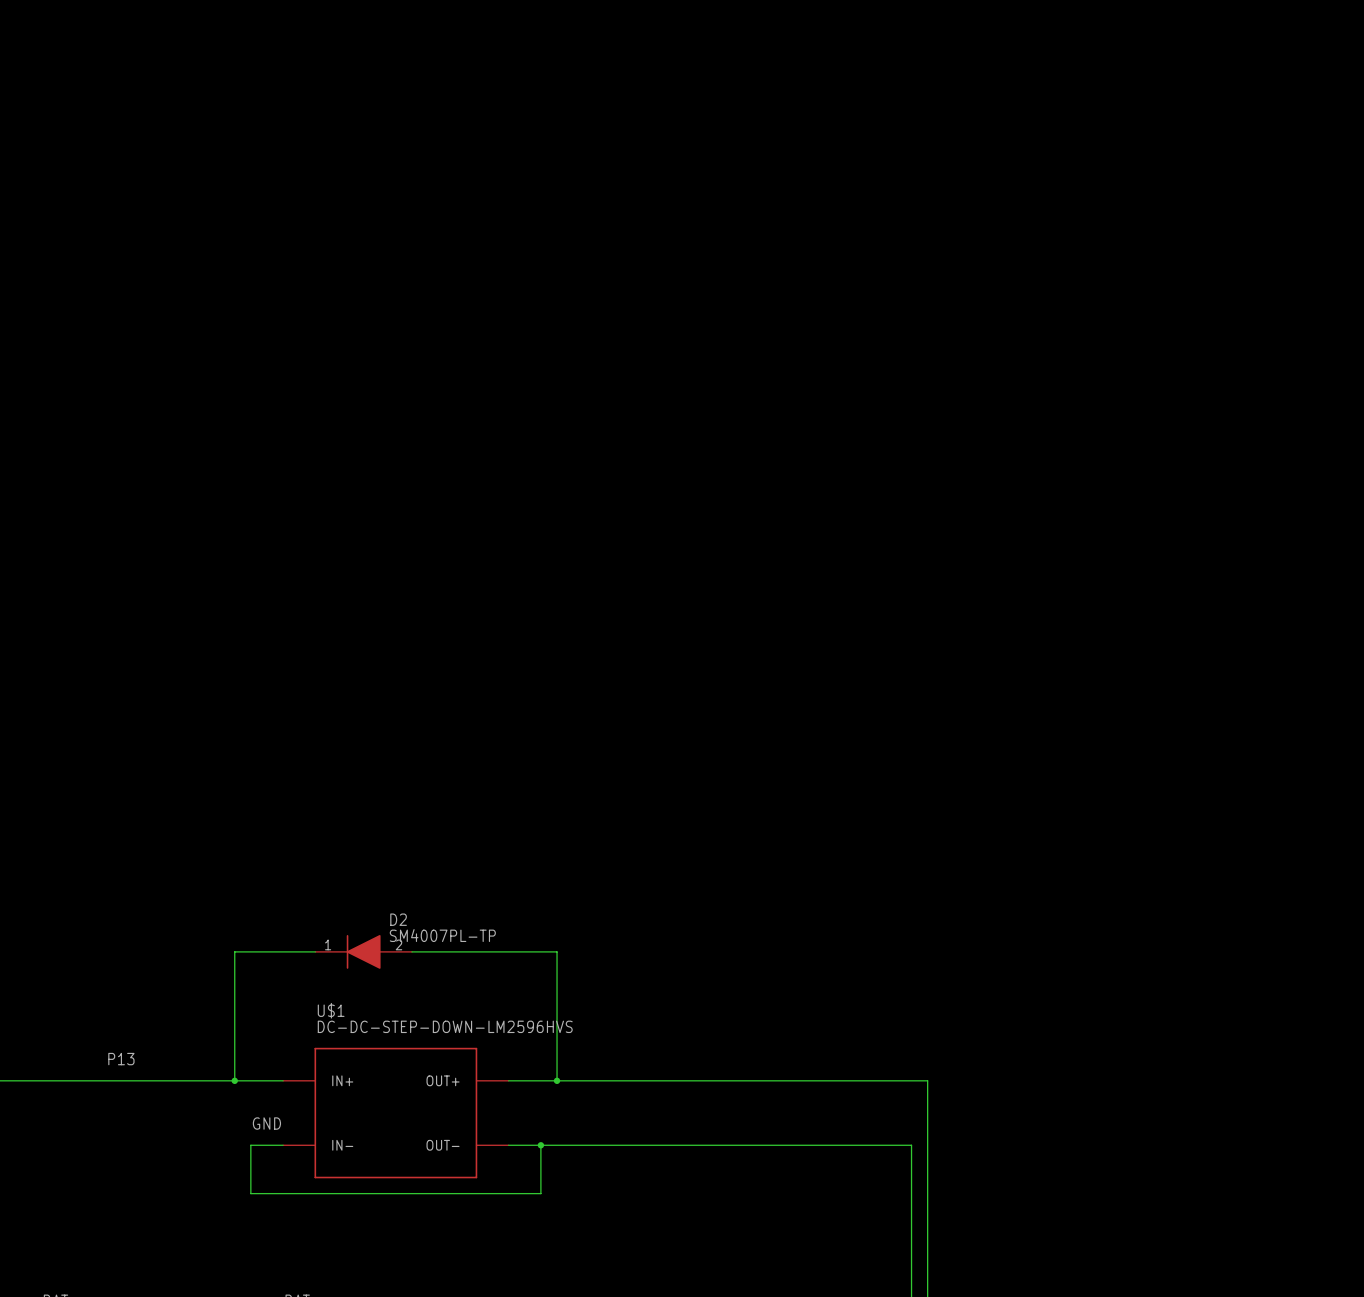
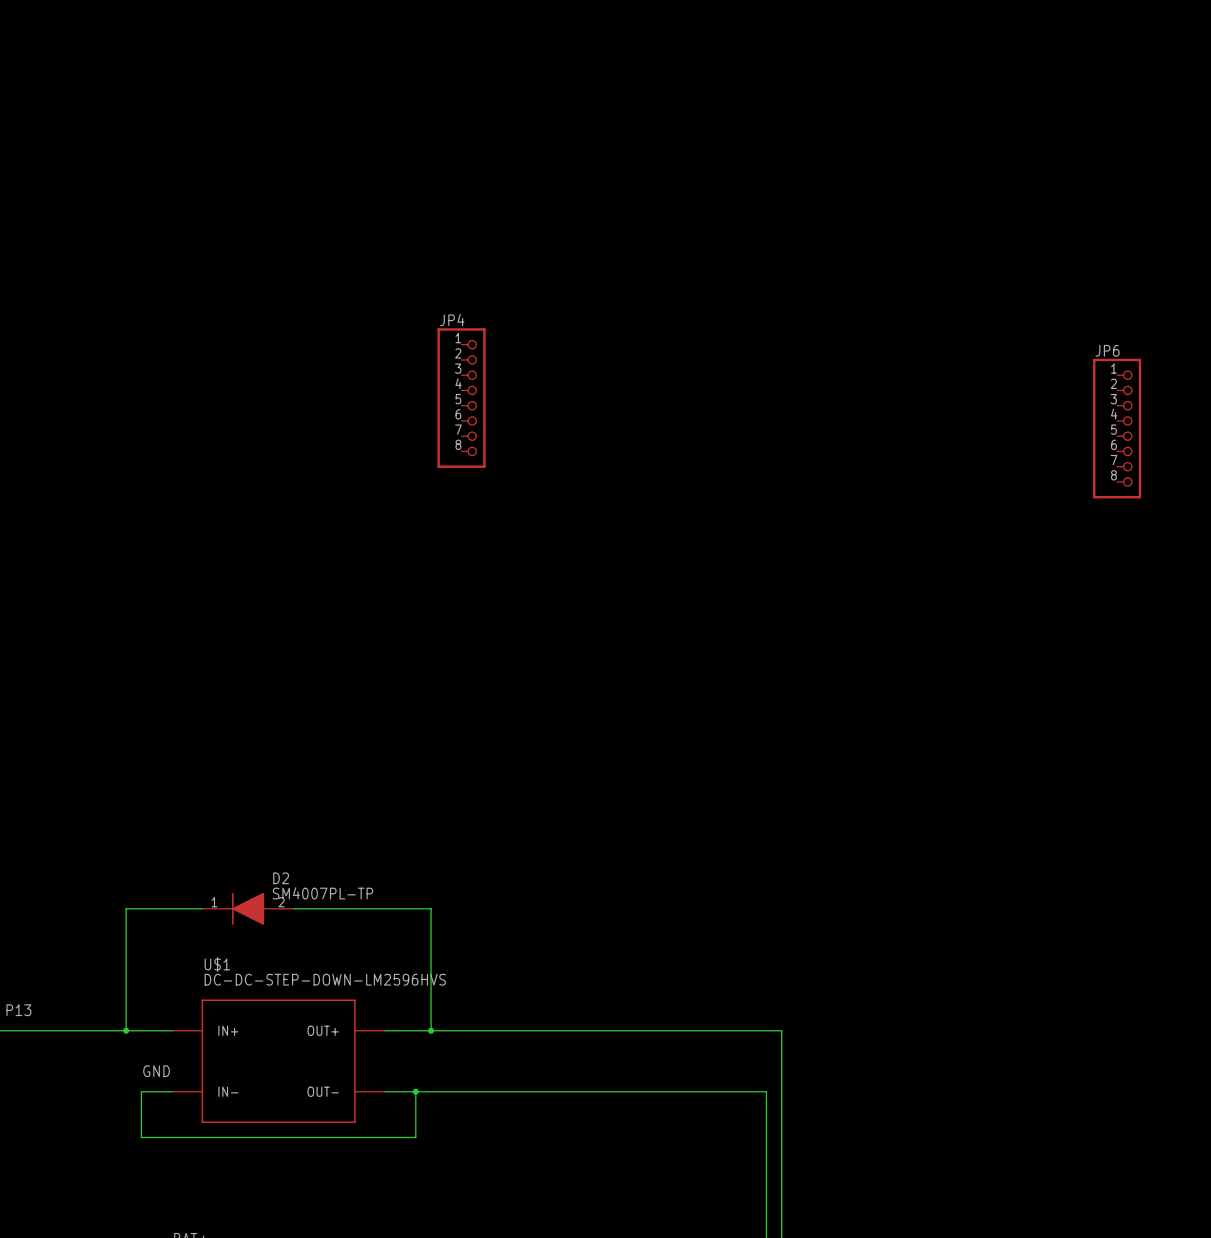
JP4: none -> (461, 398)
JP6: none -> (1117, 428)

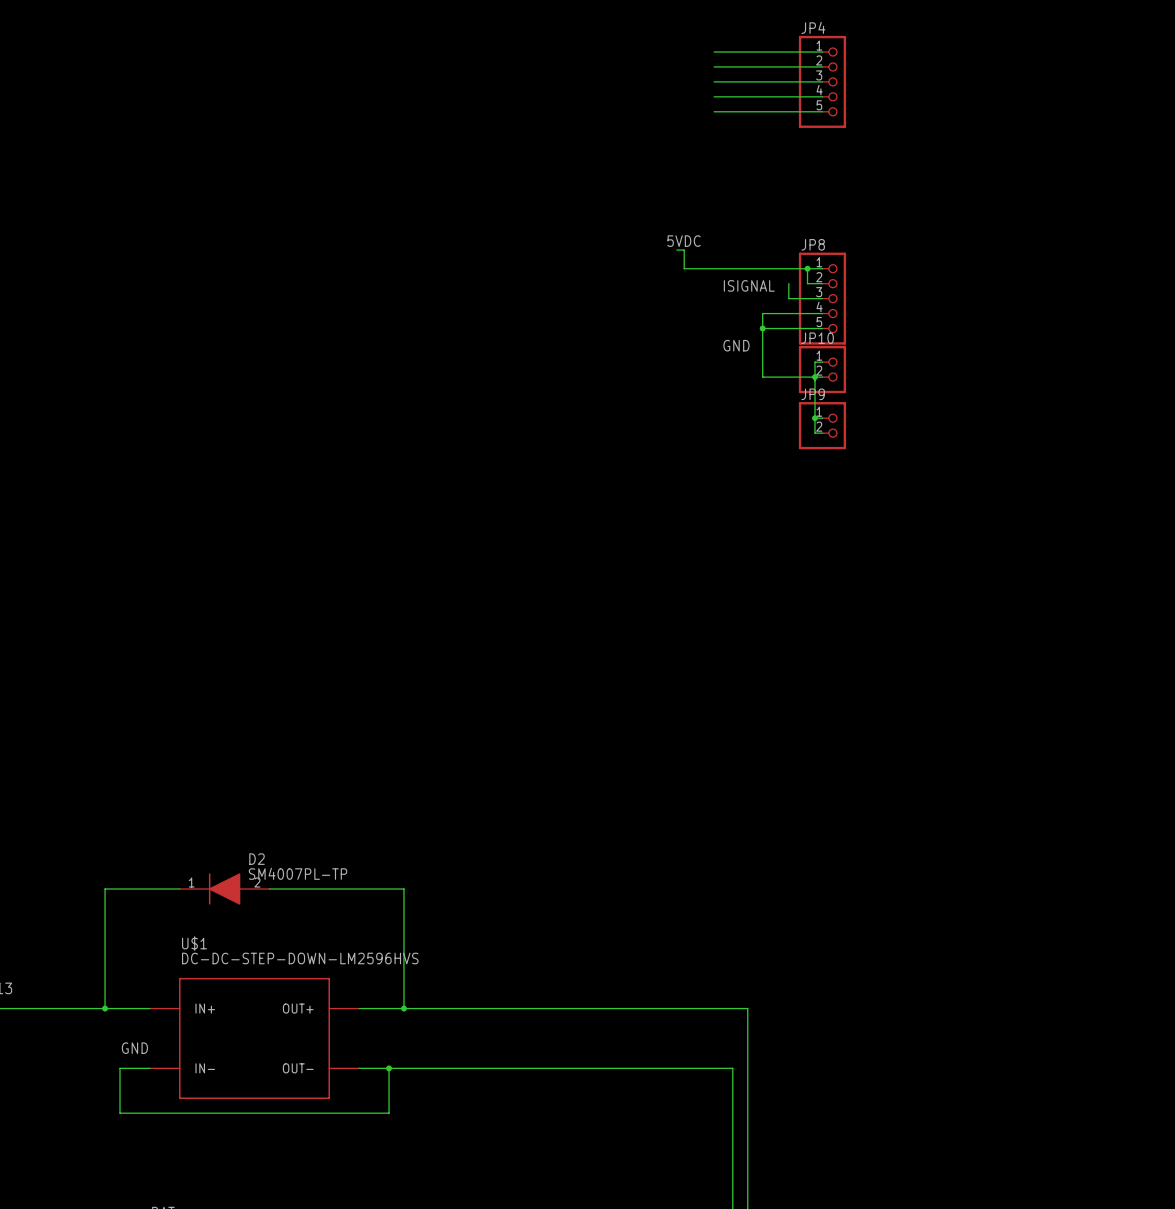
wire: none -> (714, 52) (822, 52)
wire: none -> (714, 66) (822, 66)
wire: none -> (714, 81) (822, 81)
wire: none -> (714, 96) (822, 96)
wire: none -> (714, 111) (822, 111)
label: none -> 5VDC (684, 241)
wire: none -> (676, 250) (684, 250) (684, 268) (822, 268)
wire: none -> (807, 268) (807, 283) (822, 283)
junction: none -> (807, 268)
wire: none -> (788, 283) (788, 298) (822, 298)
label: none -> ISIGNAL (749, 285)
JP8: none -> (822, 298)
JP4 name position: JP4 (452, 320) -> JP4 (813, 27)
wire: none -> (822, 313) (762, 313) (762, 377) (822, 377)
JP4 symbol: [437, 328, 486, 468] -> [798, 35, 847, 128]
wire: none -> (762, 328) (822, 328)
junction: none -> (762, 328)
label: none -> GND (736, 345)
wire: none -> (822, 362) (814, 362) (814, 433) (822, 433)
JP10: none -> (822, 369)
junction: none -> (814, 377)
wire: none -> (814, 418) (822, 418)
junction: none -> (814, 418)
JP6: (1117, 428) -> none
JP9: none -> (822, 425)

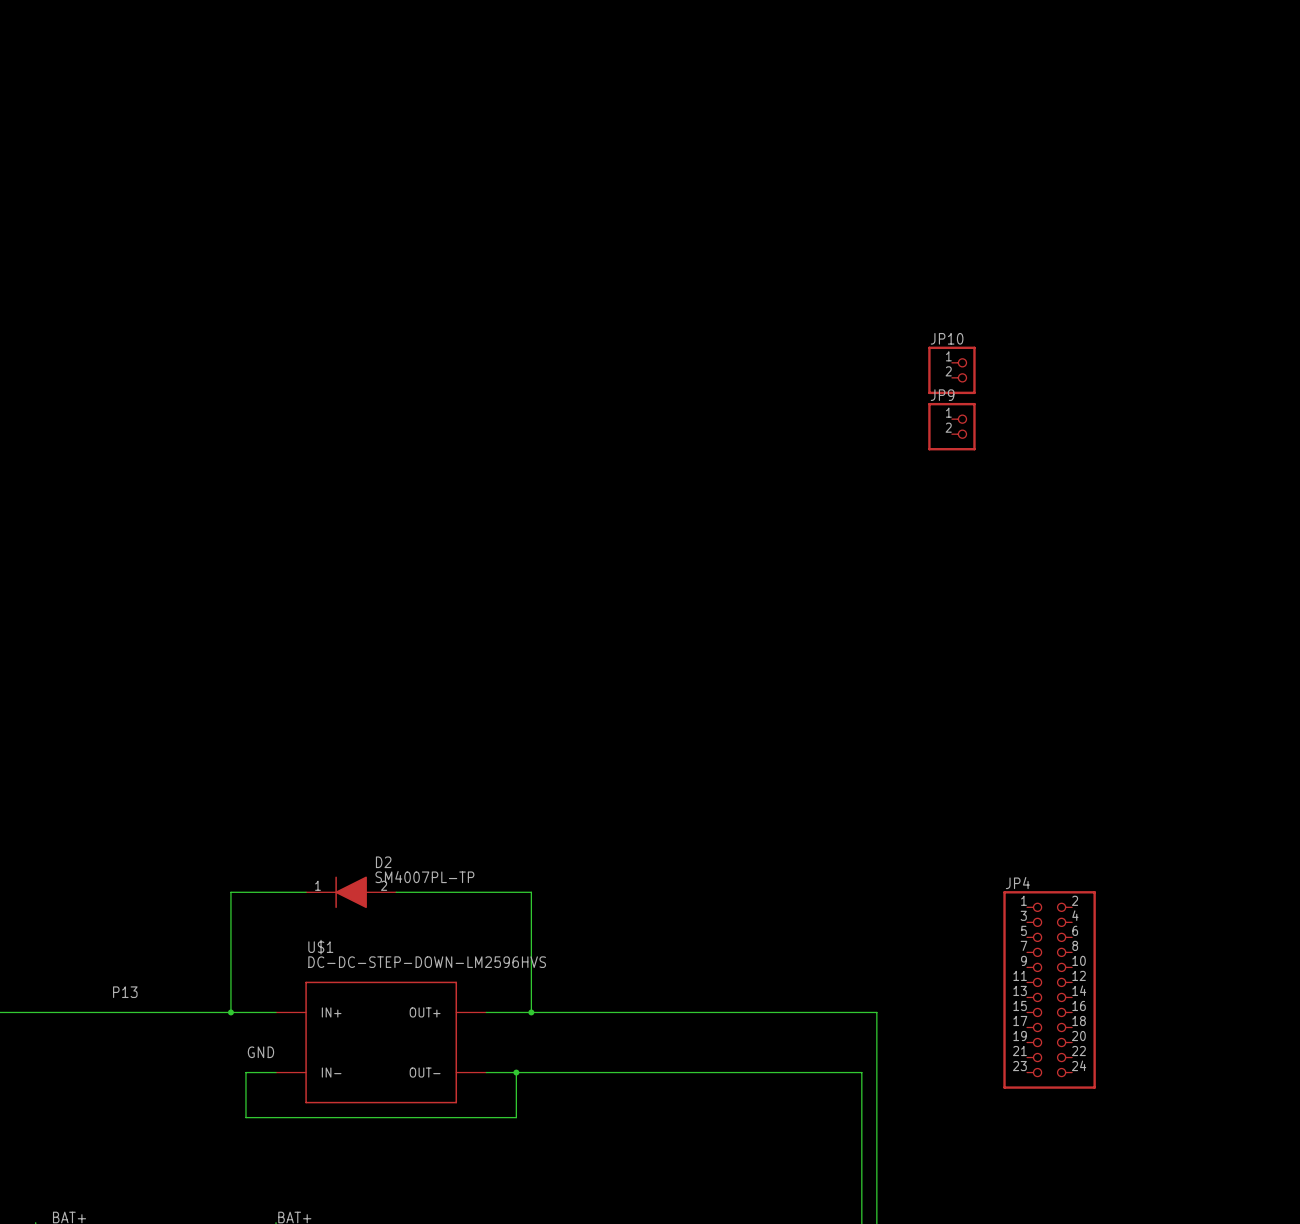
JP4 name position: JP4 (813, 27) -> JP4 (1017, 883)
JP4 symbol: [798, 35, 847, 128] -> [1003, 891, 1096, 1089]
wire: (714, 52) (822, 52) -> none
wire: (714, 66) (822, 66) -> none
wire: (714, 81) (822, 81) -> none
wire: (714, 96) (822, 96) -> none
wire: (714, 111) (822, 111) -> none
label: 5VDC (684, 241) -> none
wire: (676, 250) (684, 250) (684, 268) (822, 268) -> none
wire: (807, 268) (807, 283) (822, 283) -> none
junction: (807, 268) -> none
wire: (788, 283) (788, 298) (822, 298) -> none
label: ISIGNAL (749, 285) -> none
JP8: (822, 298) -> none
wire: (822, 313) (762, 313) (762, 377) (822, 377) -> none
wire: (762, 328) (822, 328) -> none
junction: (762, 328) -> none
label: GND (736, 345) -> none
wire: (822, 362) (814, 362) (814, 433) (822, 433) -> none
junction: (814, 377) -> none
wire: (814, 418) (822, 418) -> none
junction: (814, 418) -> none

